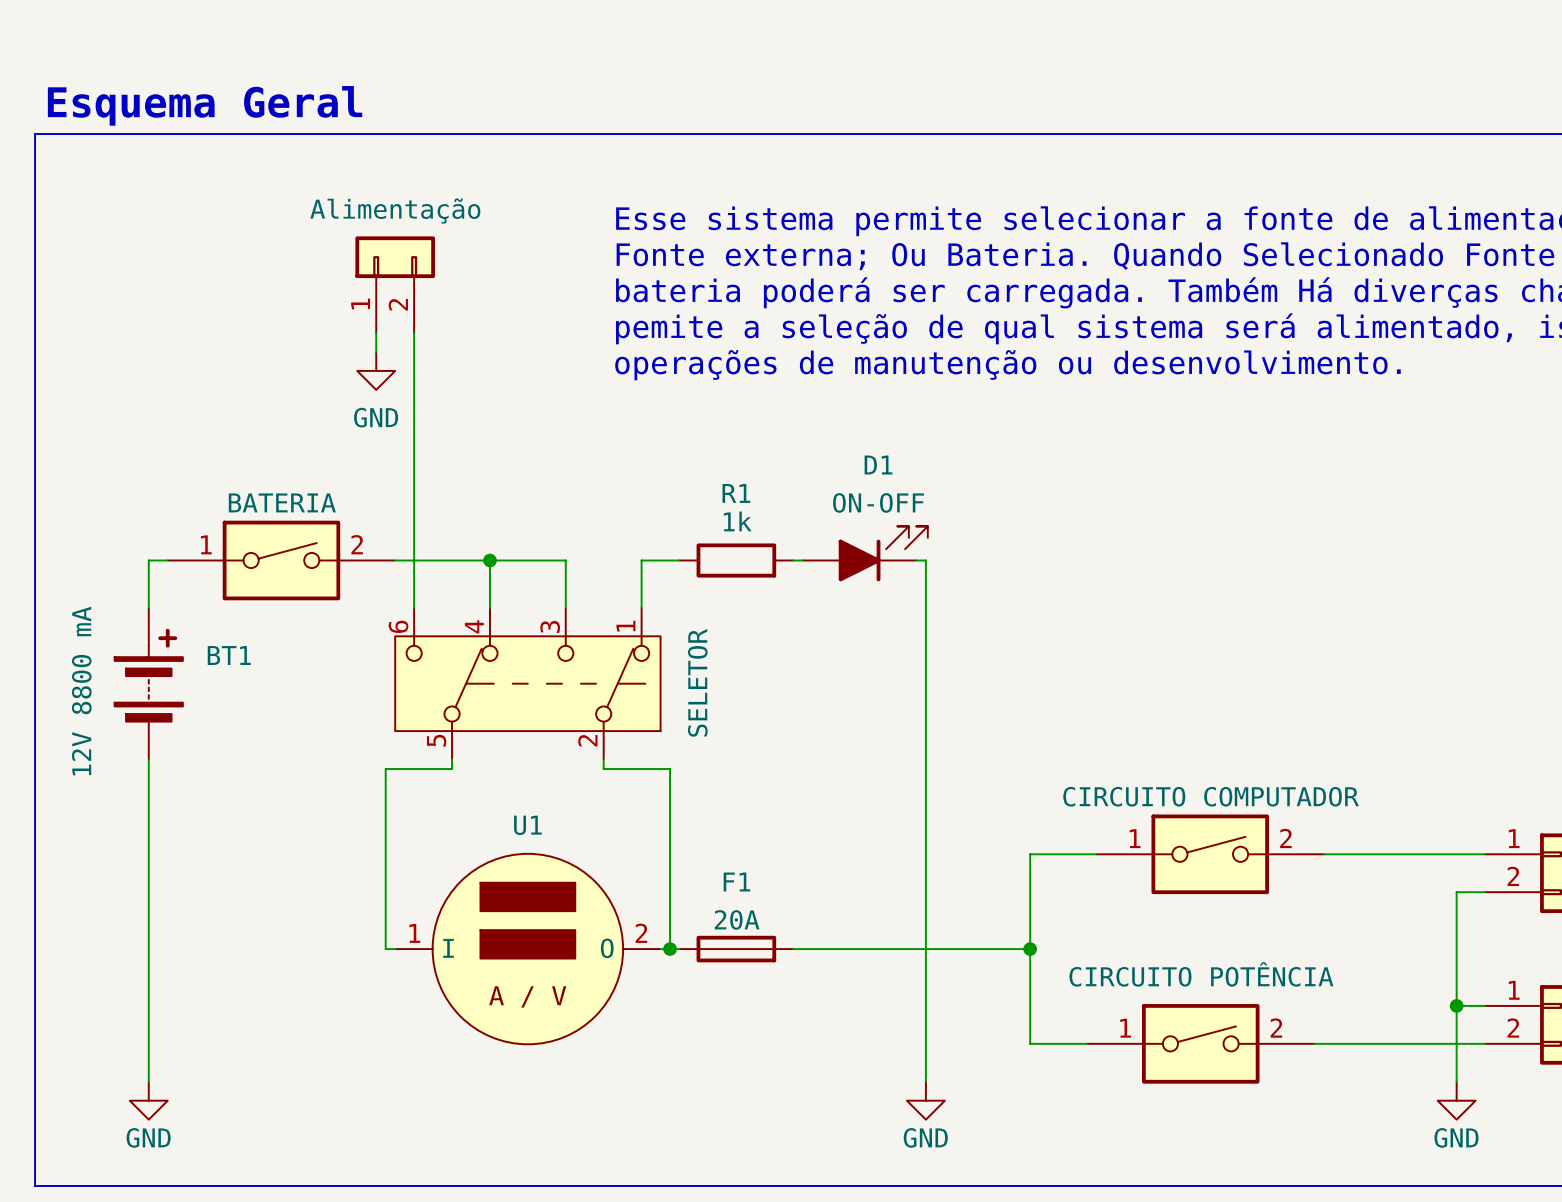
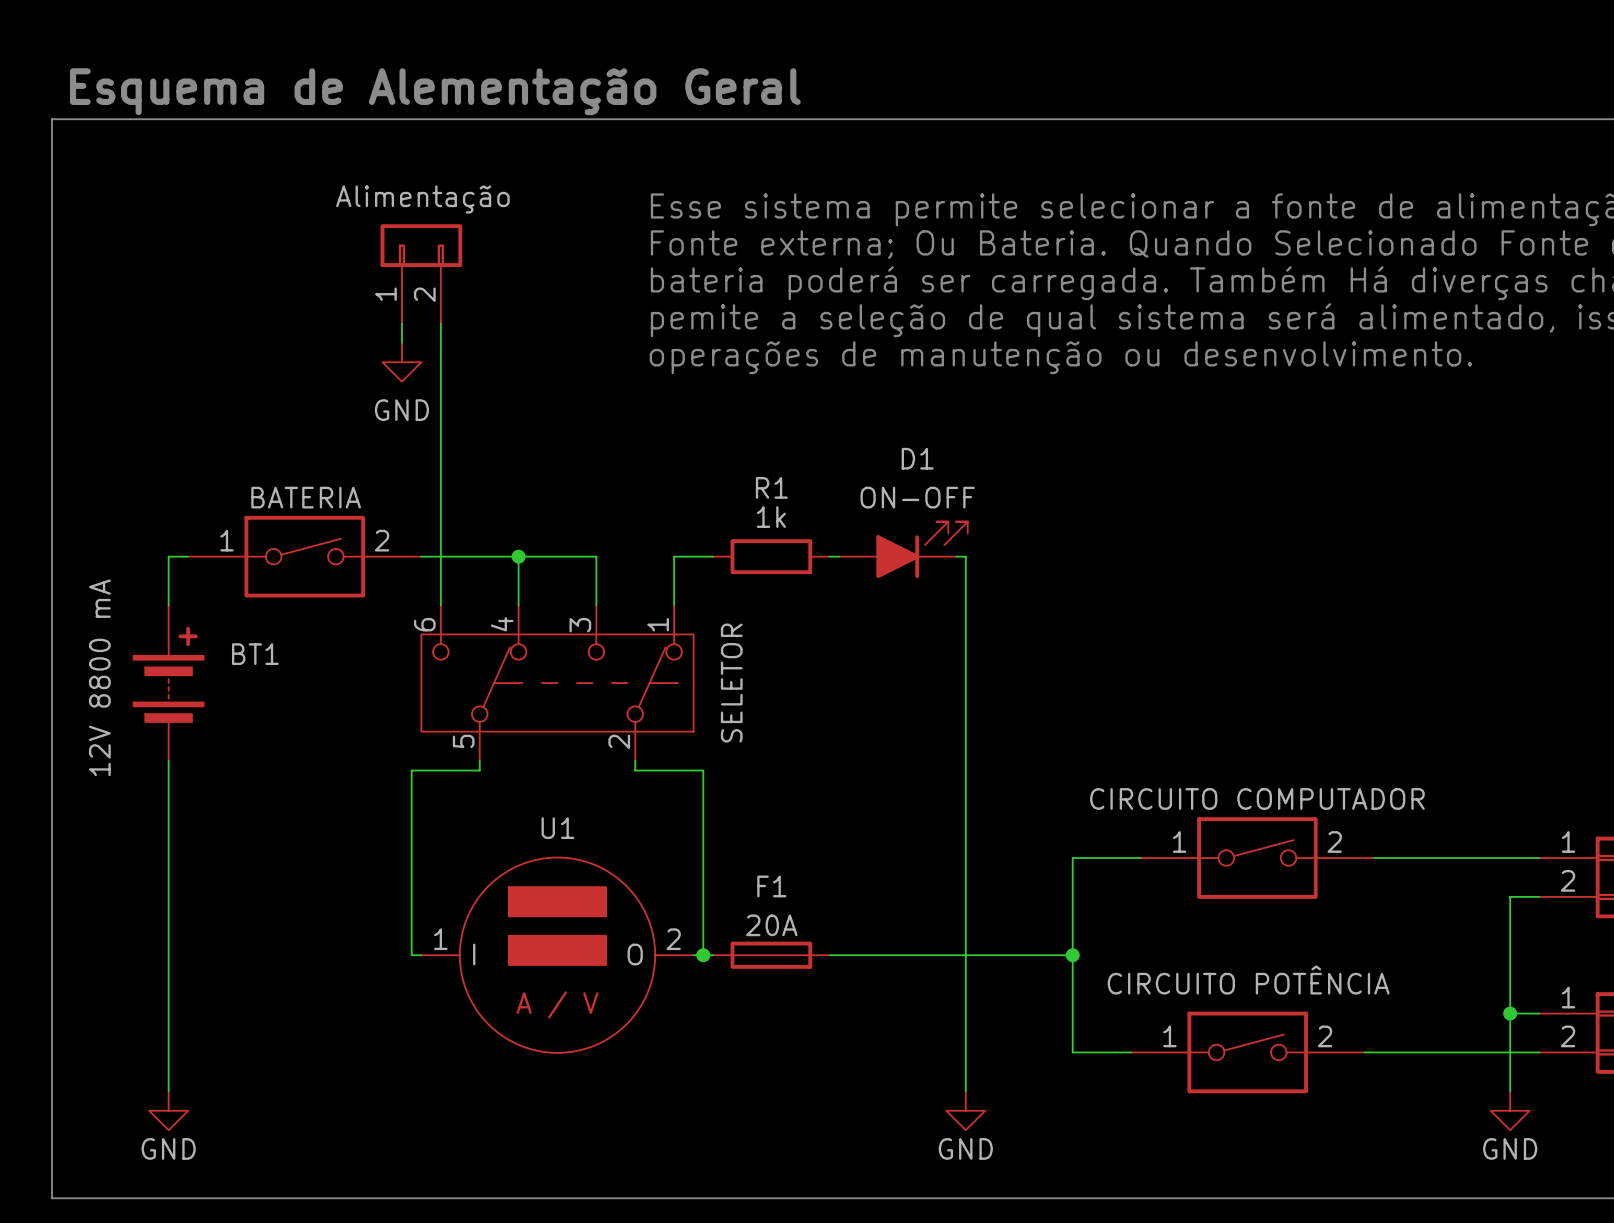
text: Esquema Geral (205, 105) -> Esquema de Alementação Geral (435, 91)

